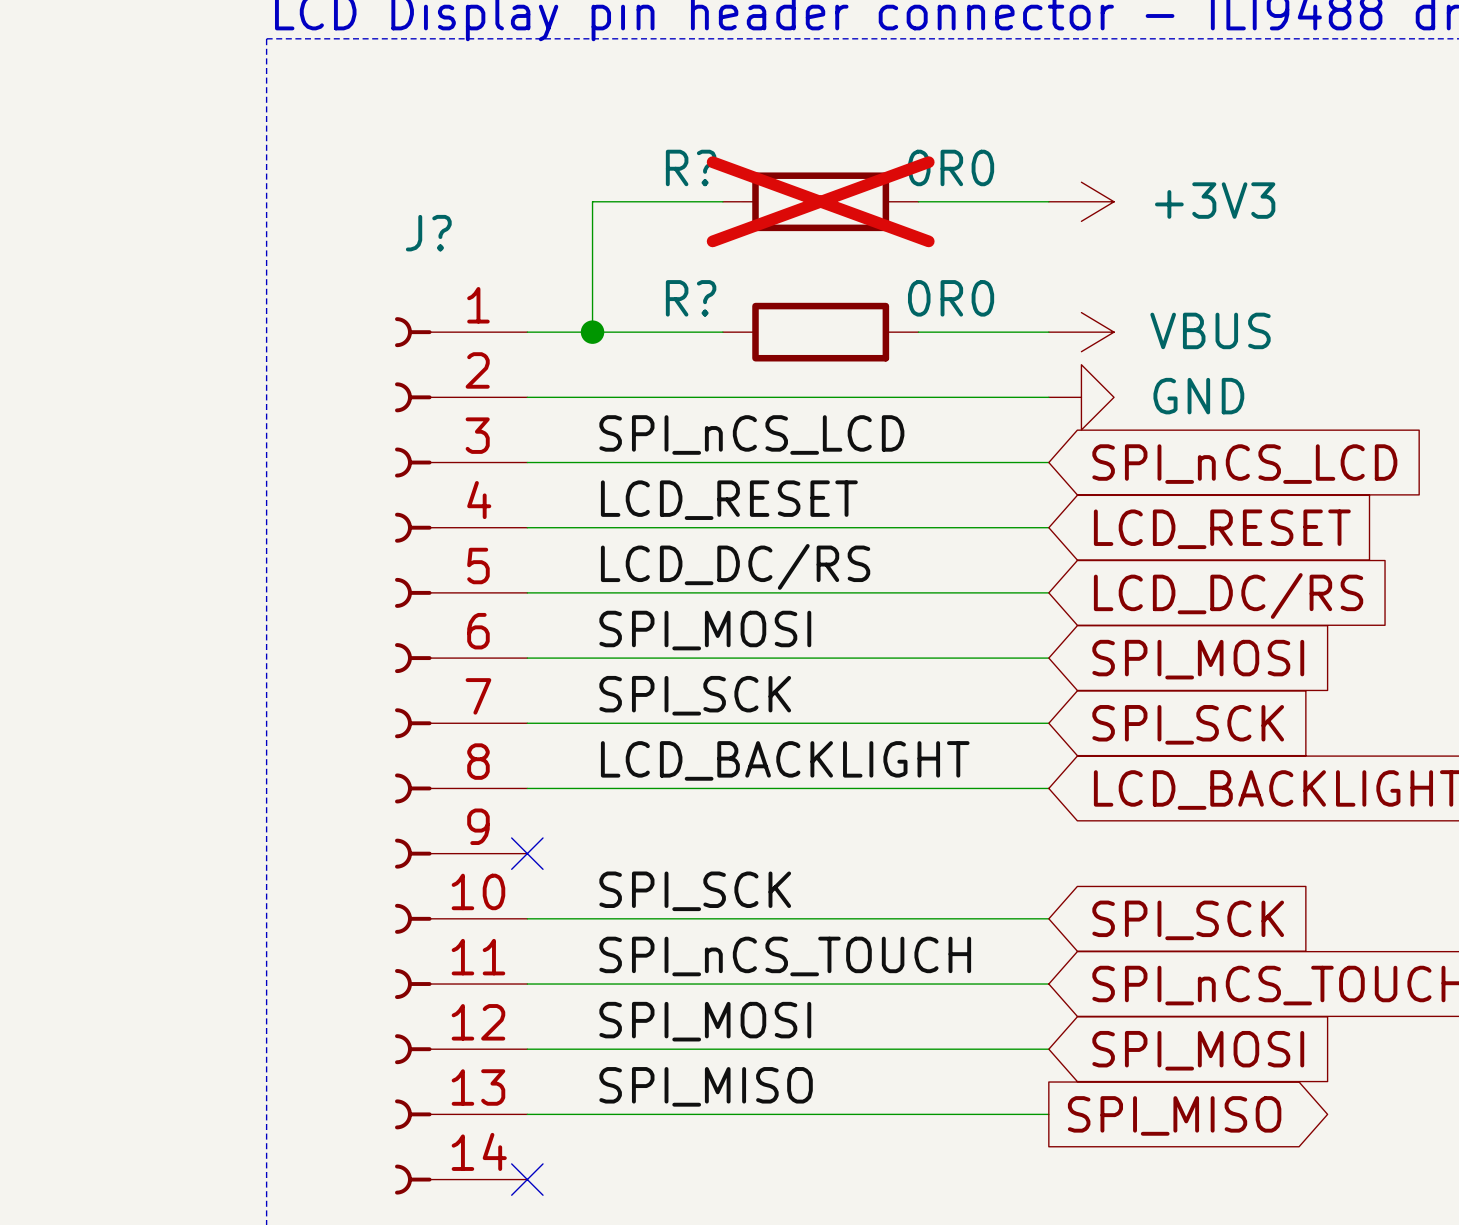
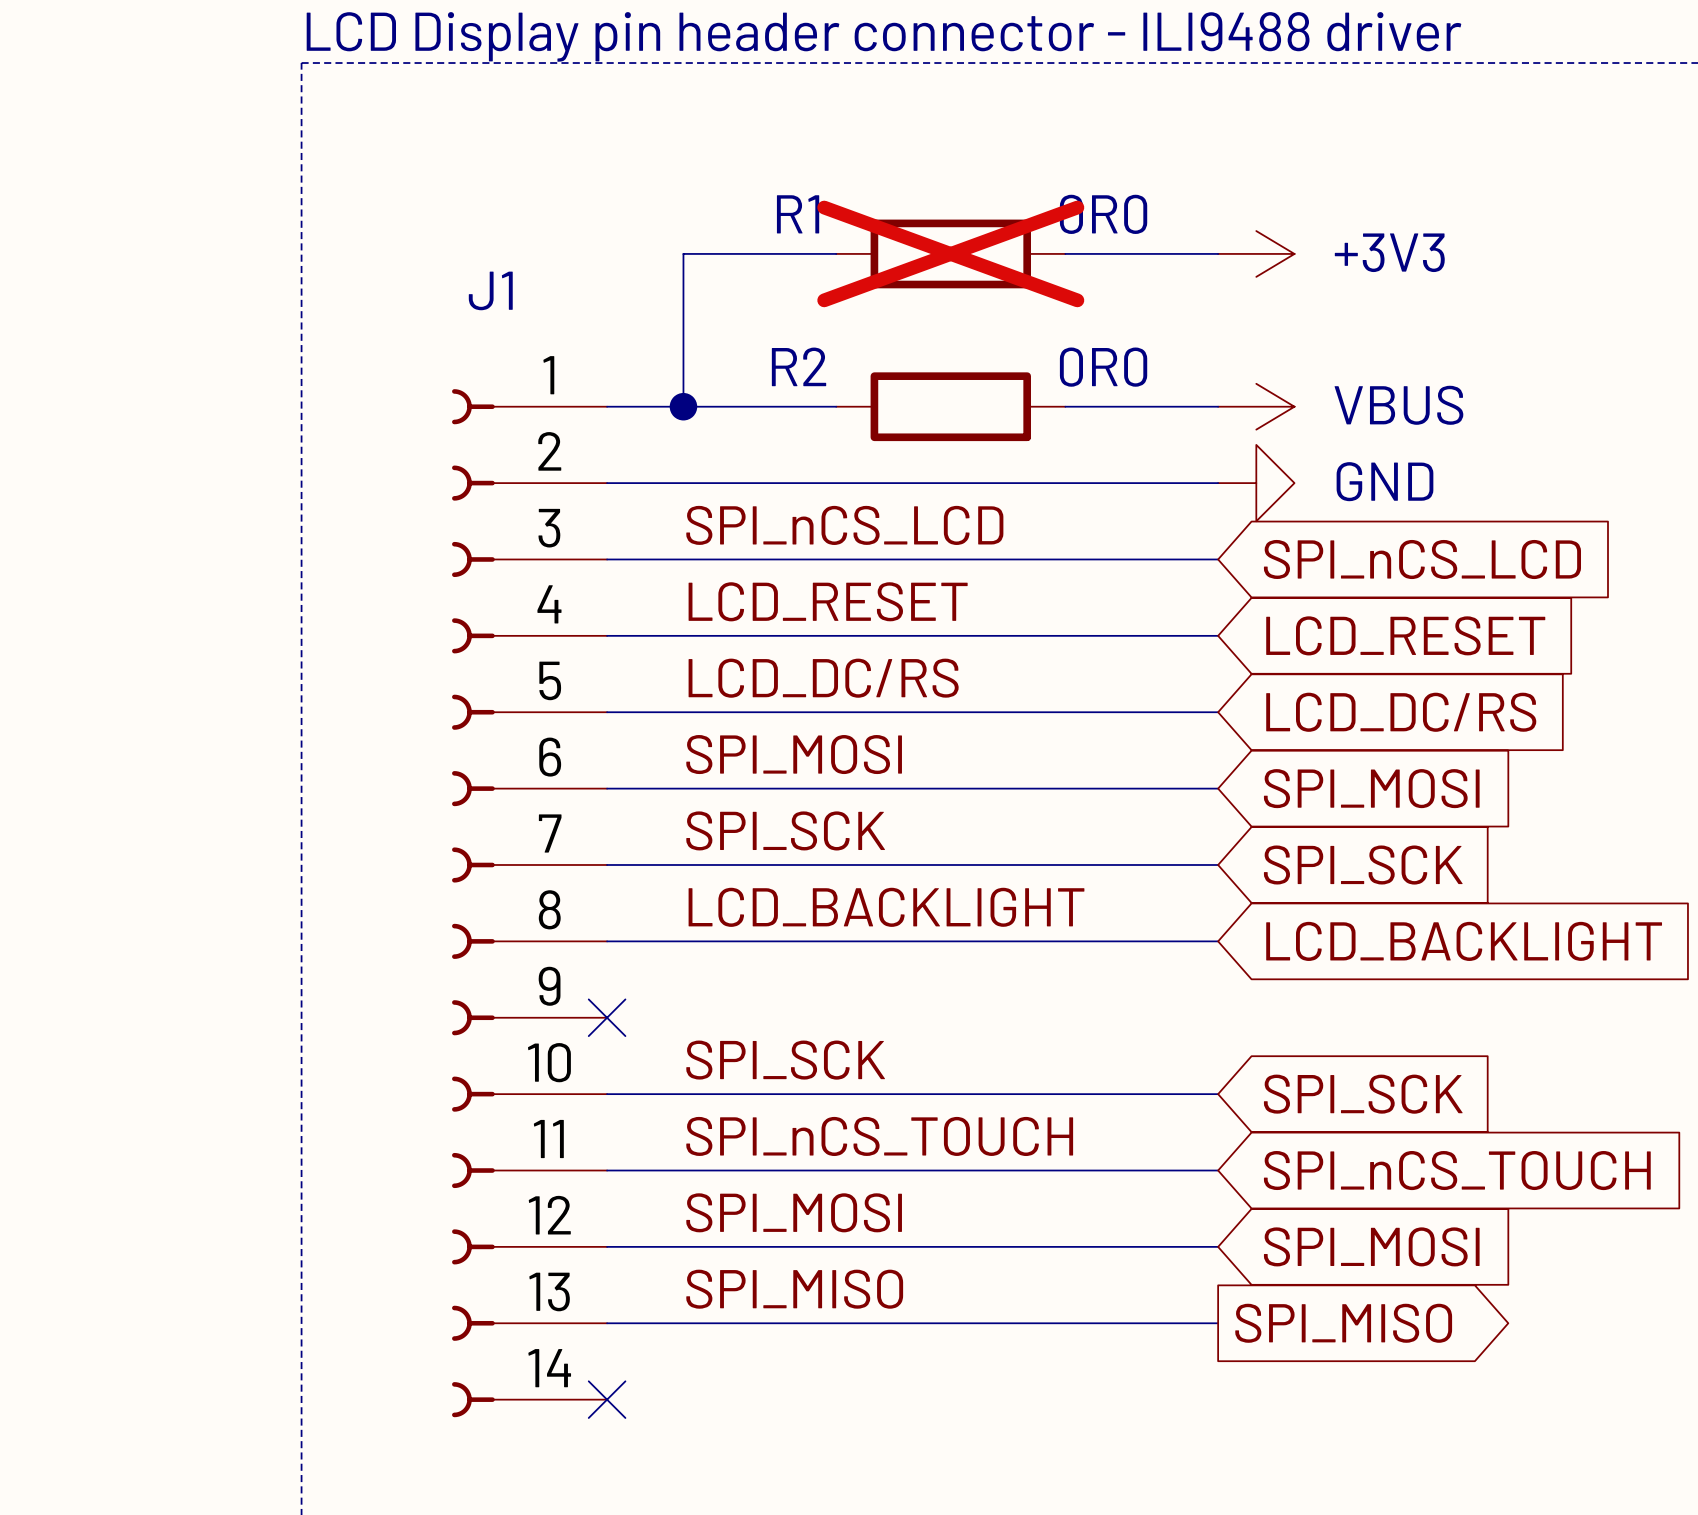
R? name: R? (691, 167) -> R1 (798, 214)
J? name: J? (428, 233) -> J1 (490, 290)
R? name: R? (691, 298) -> R2 (799, 366)

